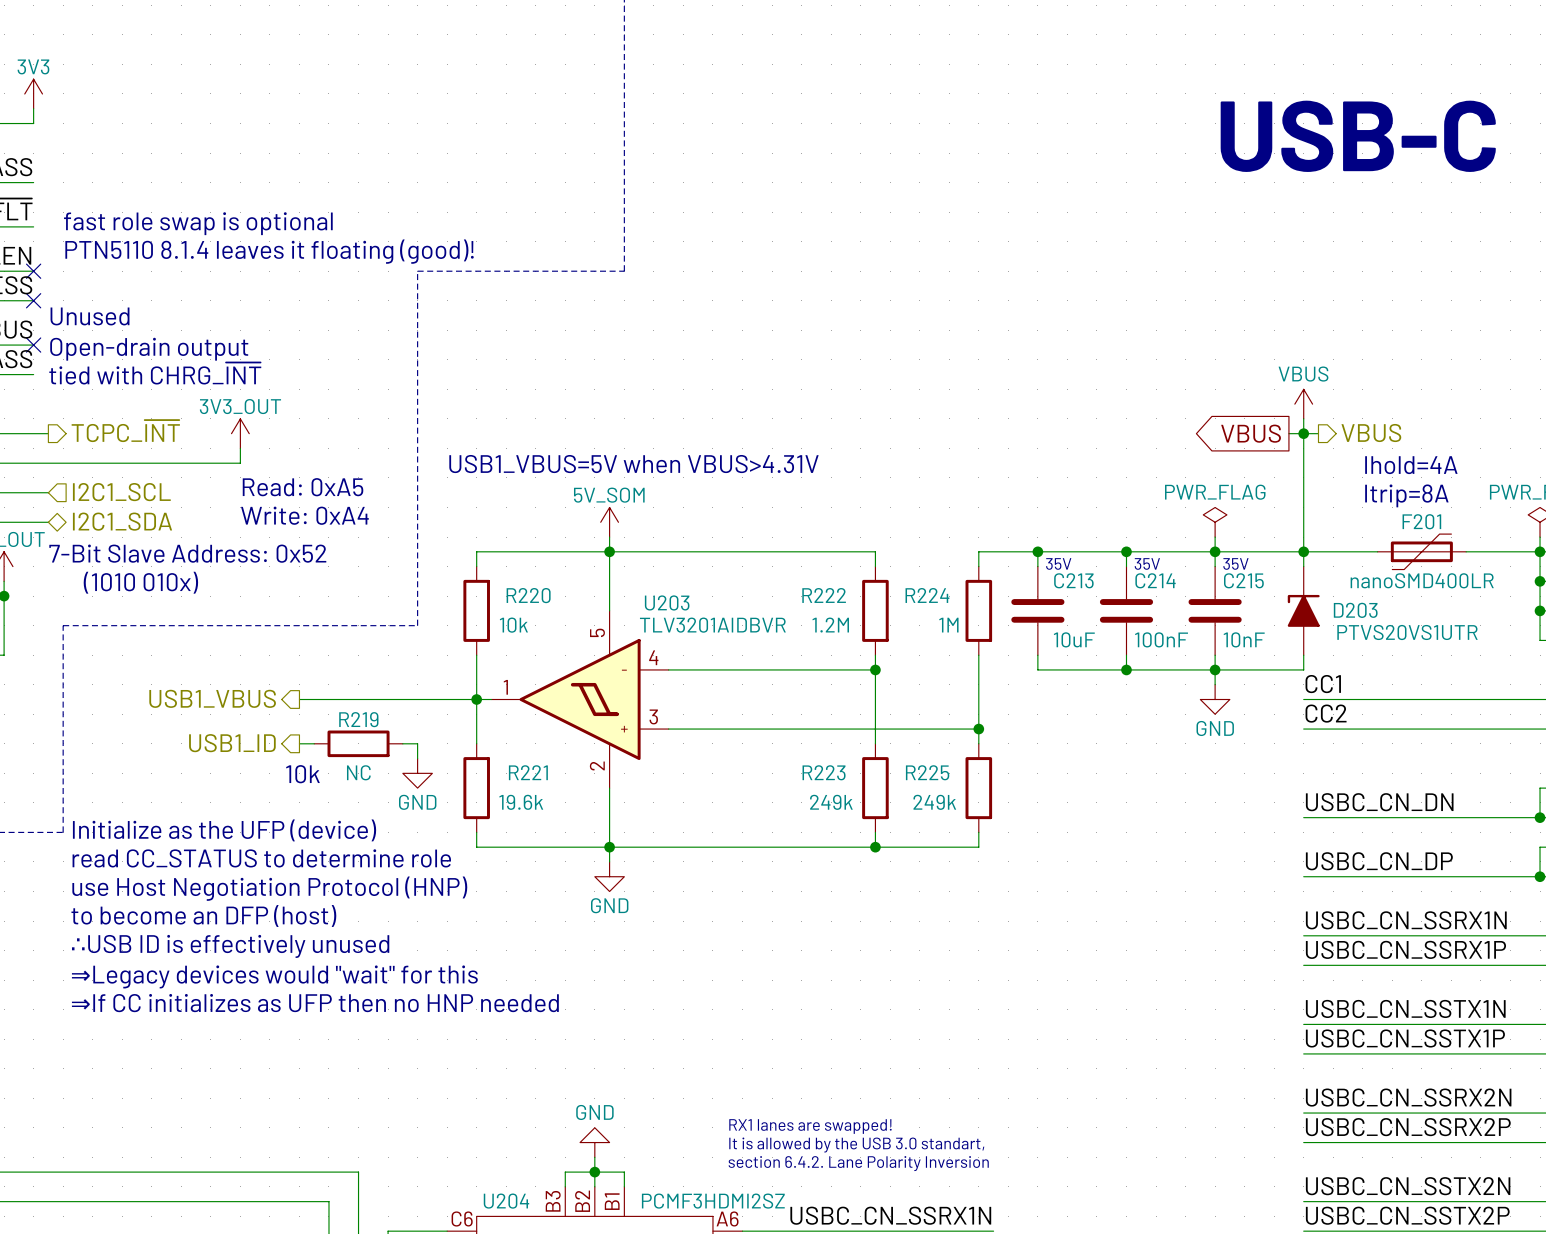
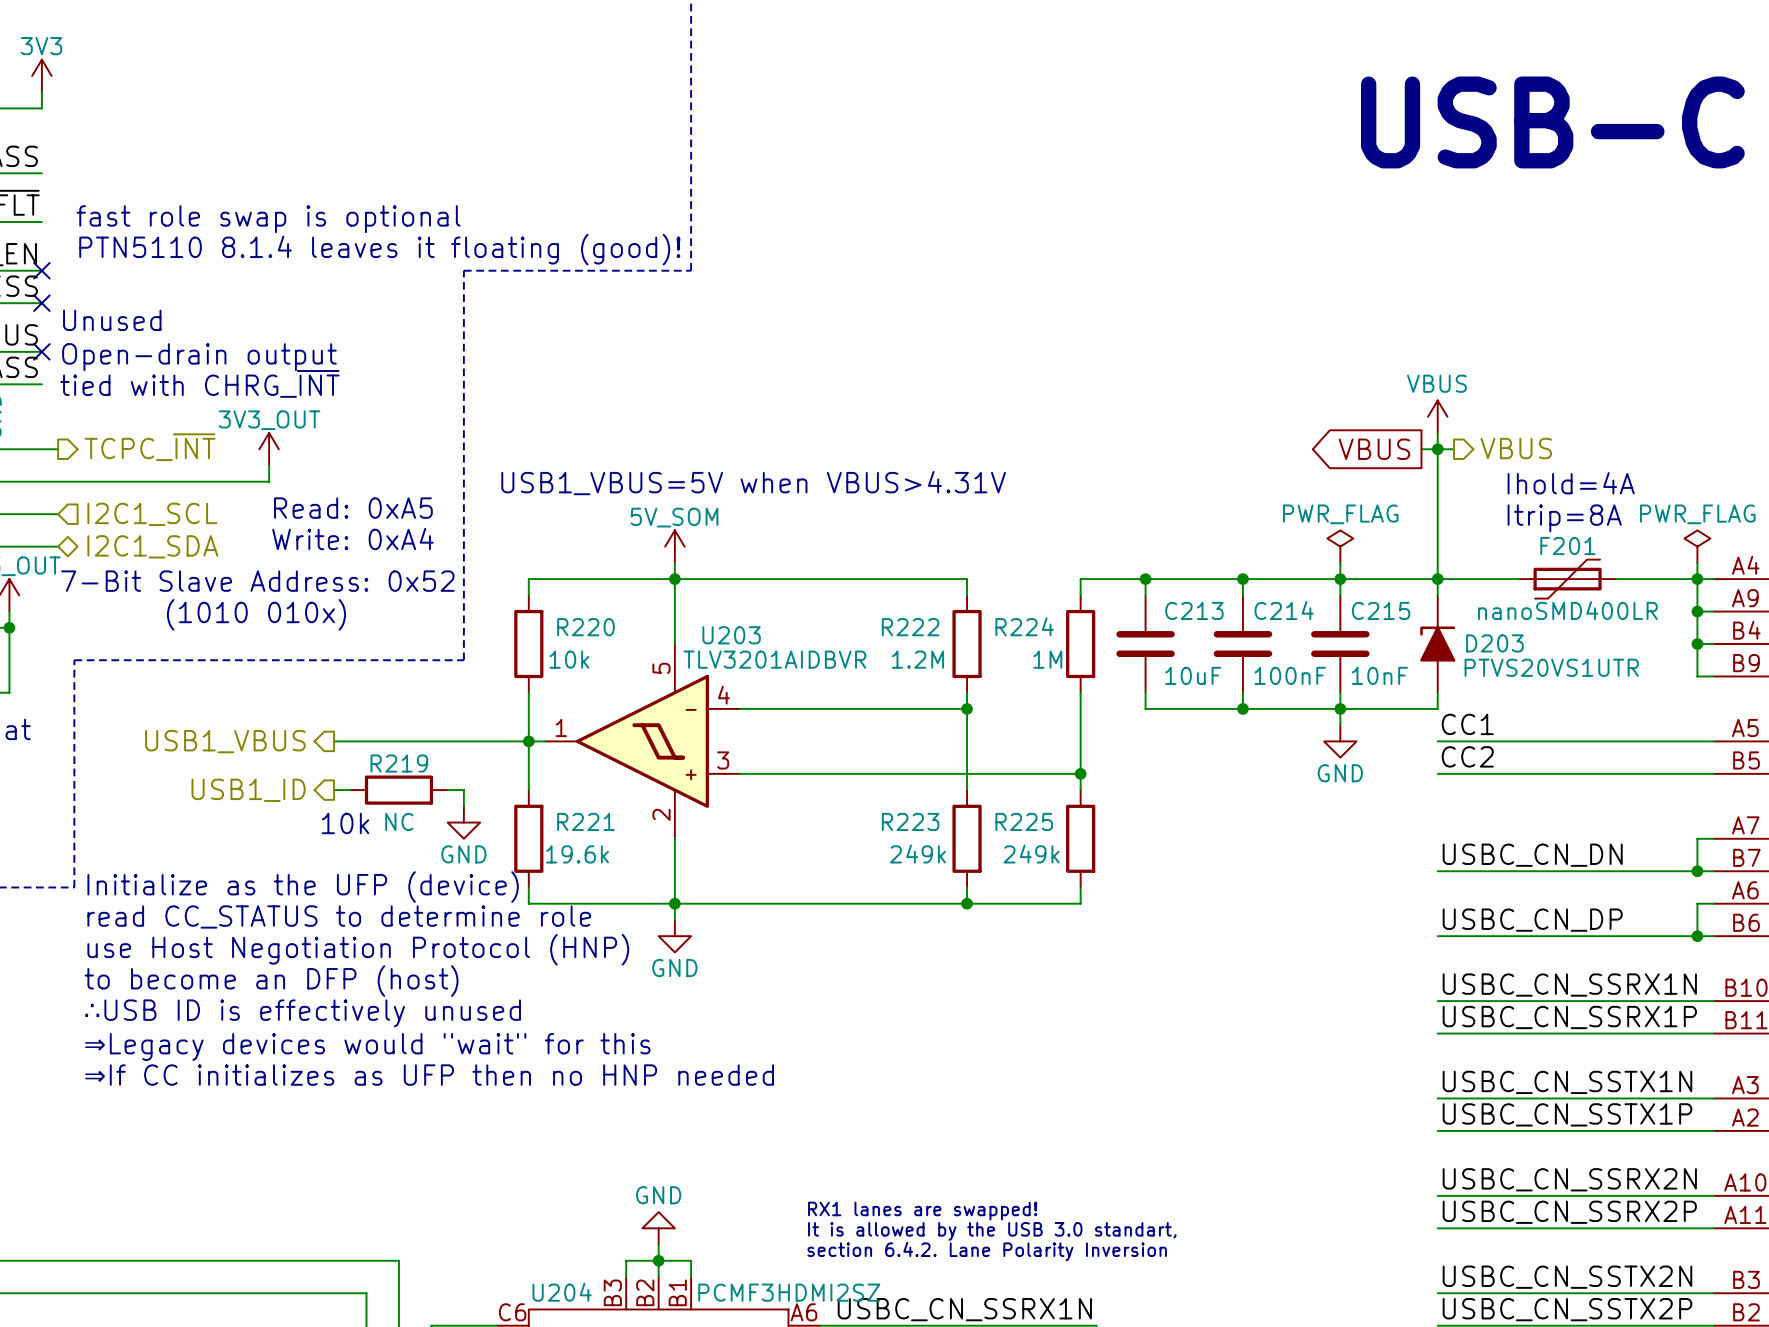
text: 35V (1058, 563) -> none
text: 35V (1147, 563) -> none
text: 35V (1235, 563) -> none

